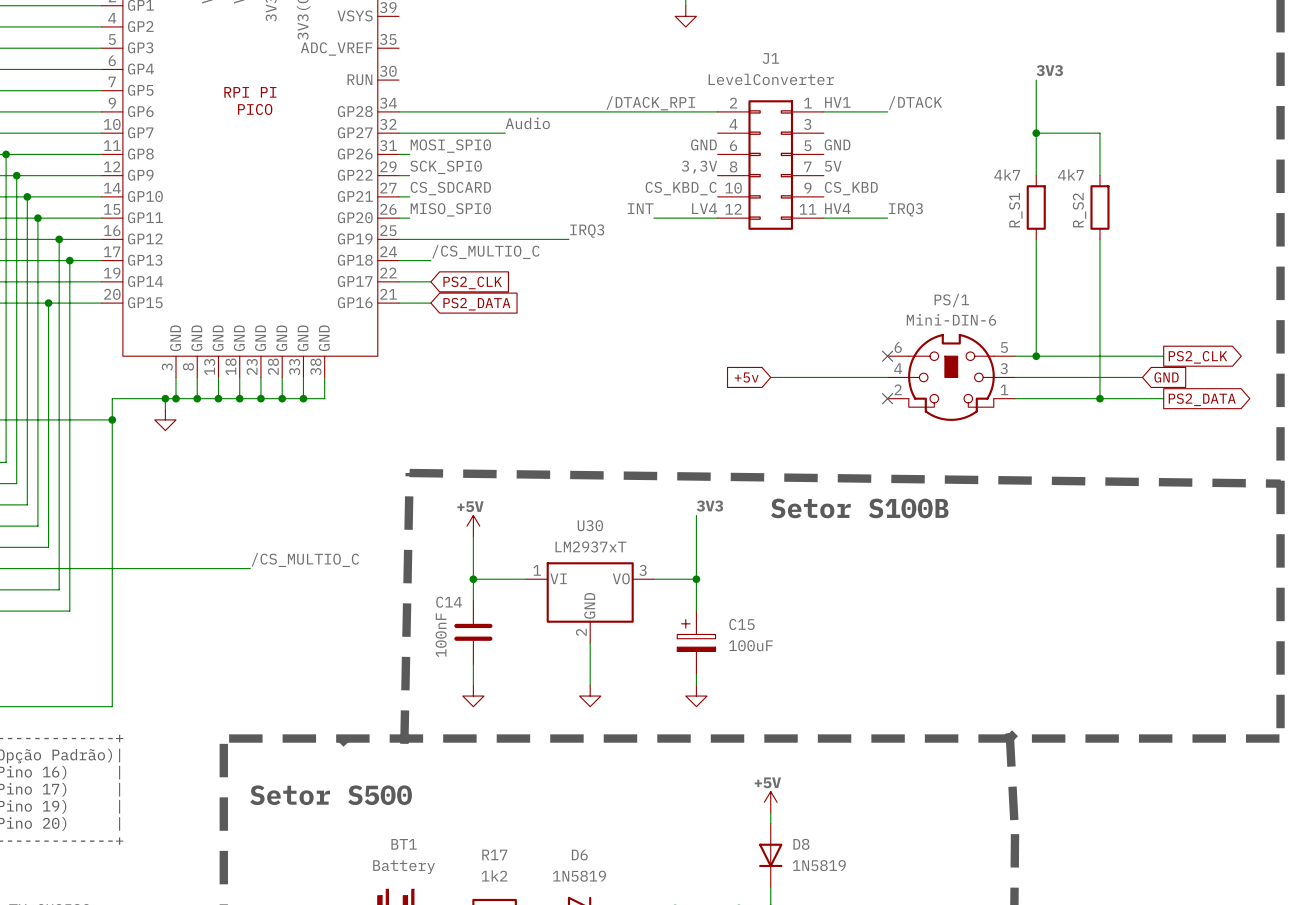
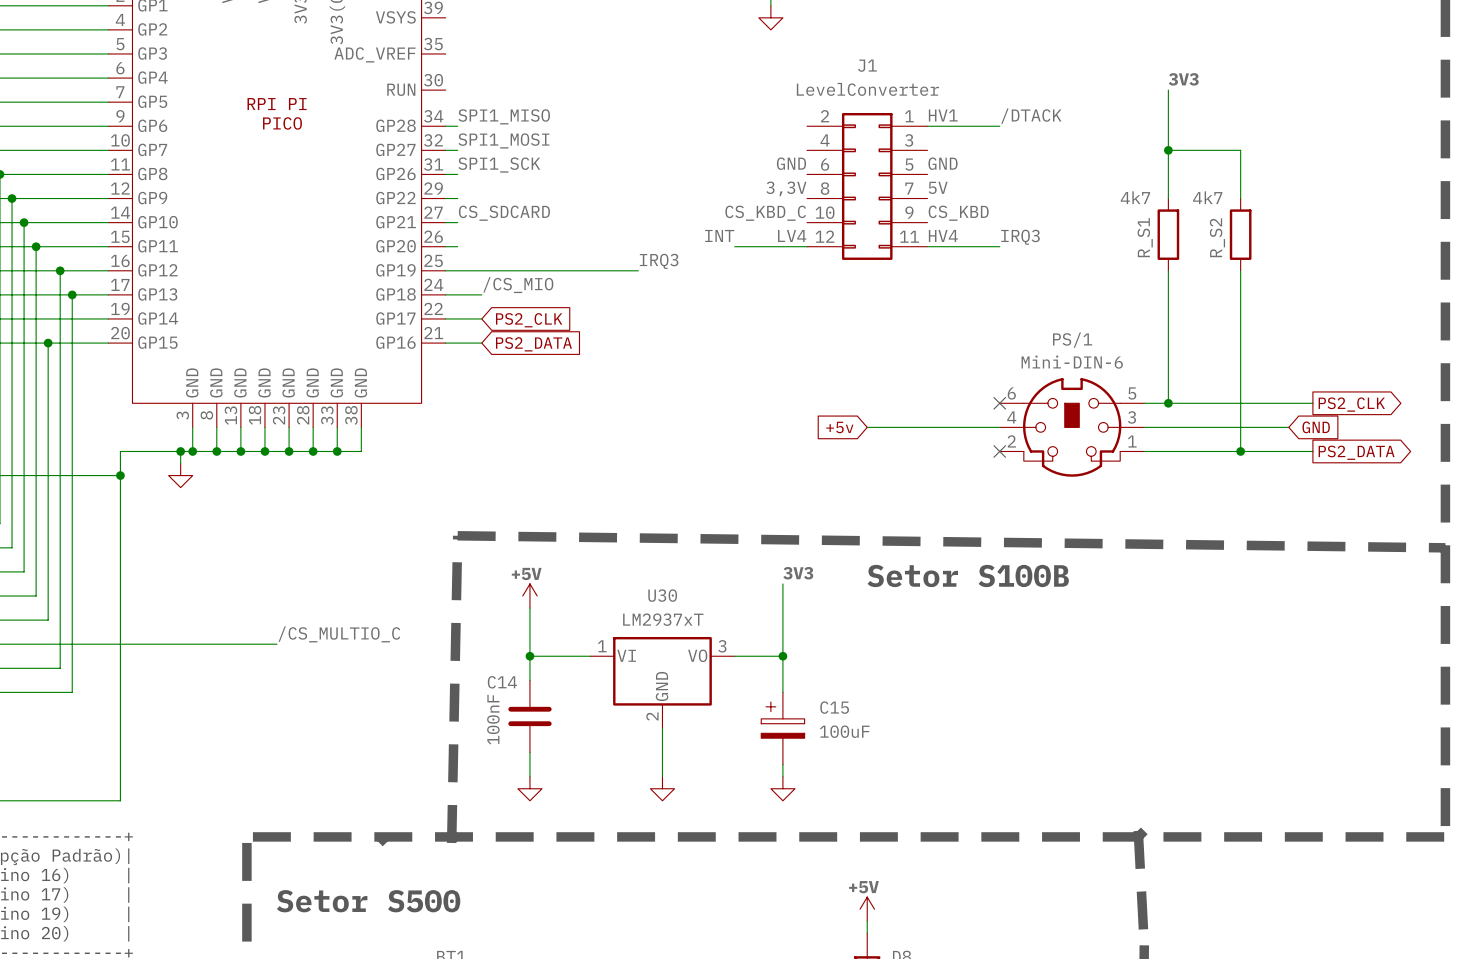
label: none -> SPI1_MISO (504, 116)
label: /DTACK_RPI (650, 103) -> none
wire: (409, 111) (717, 111) -> none
label: Audio (527, 123) -> none
label: none -> SPI1_MOSI (503, 140)
wire: (409, 133) (505, 133) -> none
label: MOSI_SPI0 (450, 146) -> SPI1_SCK (499, 165)
label: SCK_SPI0 (446, 167) -> none
label: MISO_SPI0 (450, 209) -> none
label: /CS_MULTIO_C (485, 251) -> /CS_MIO (518, 285)

